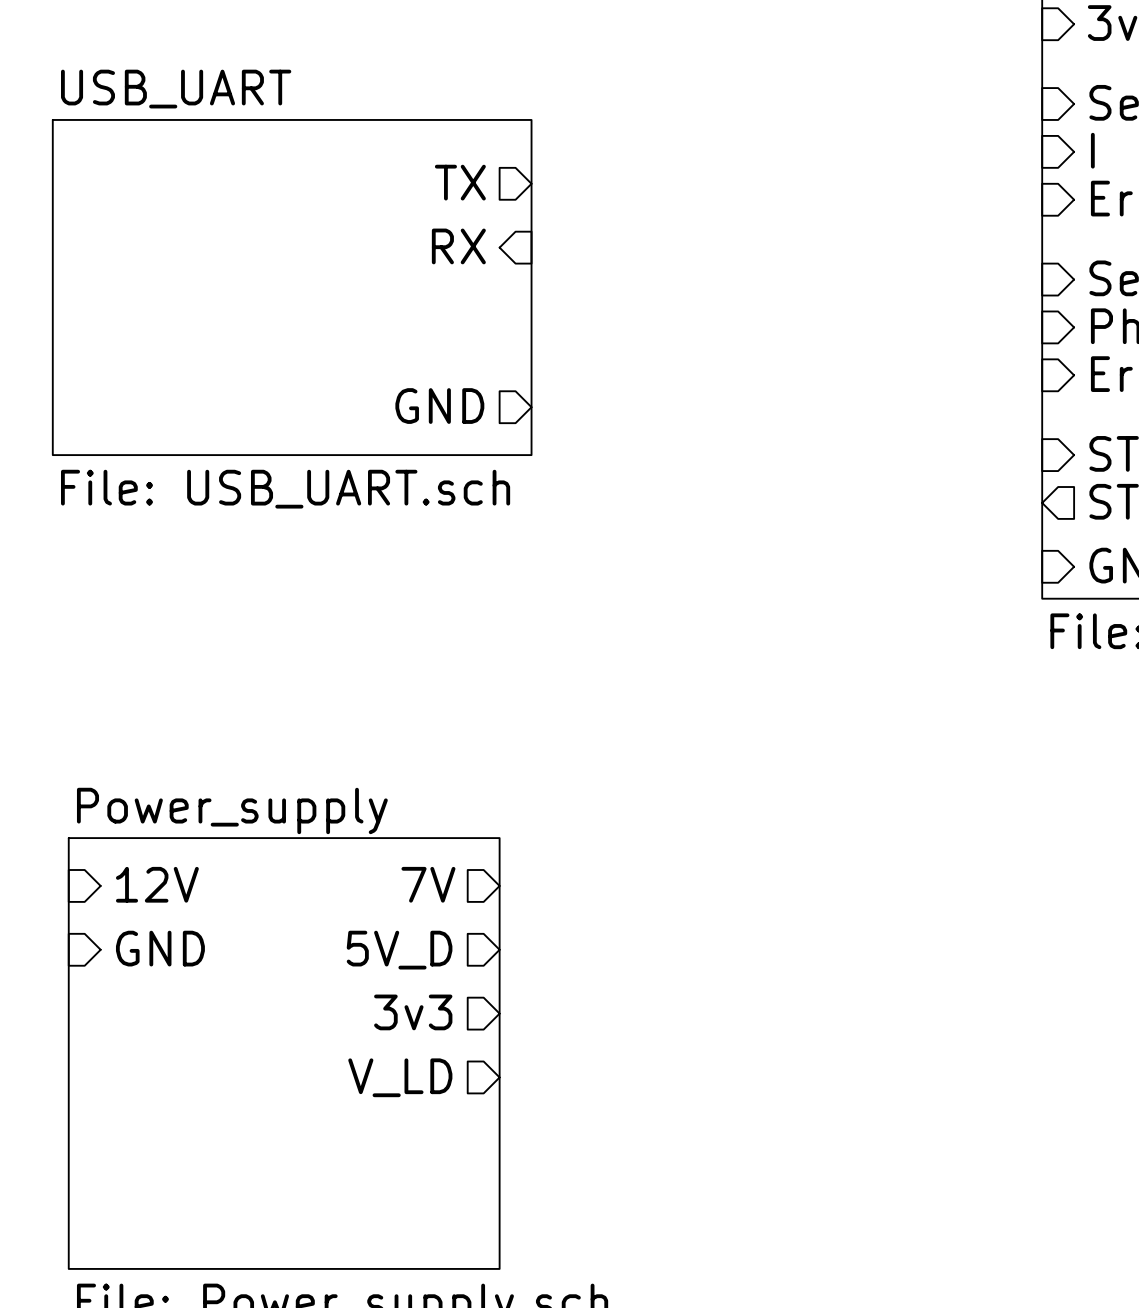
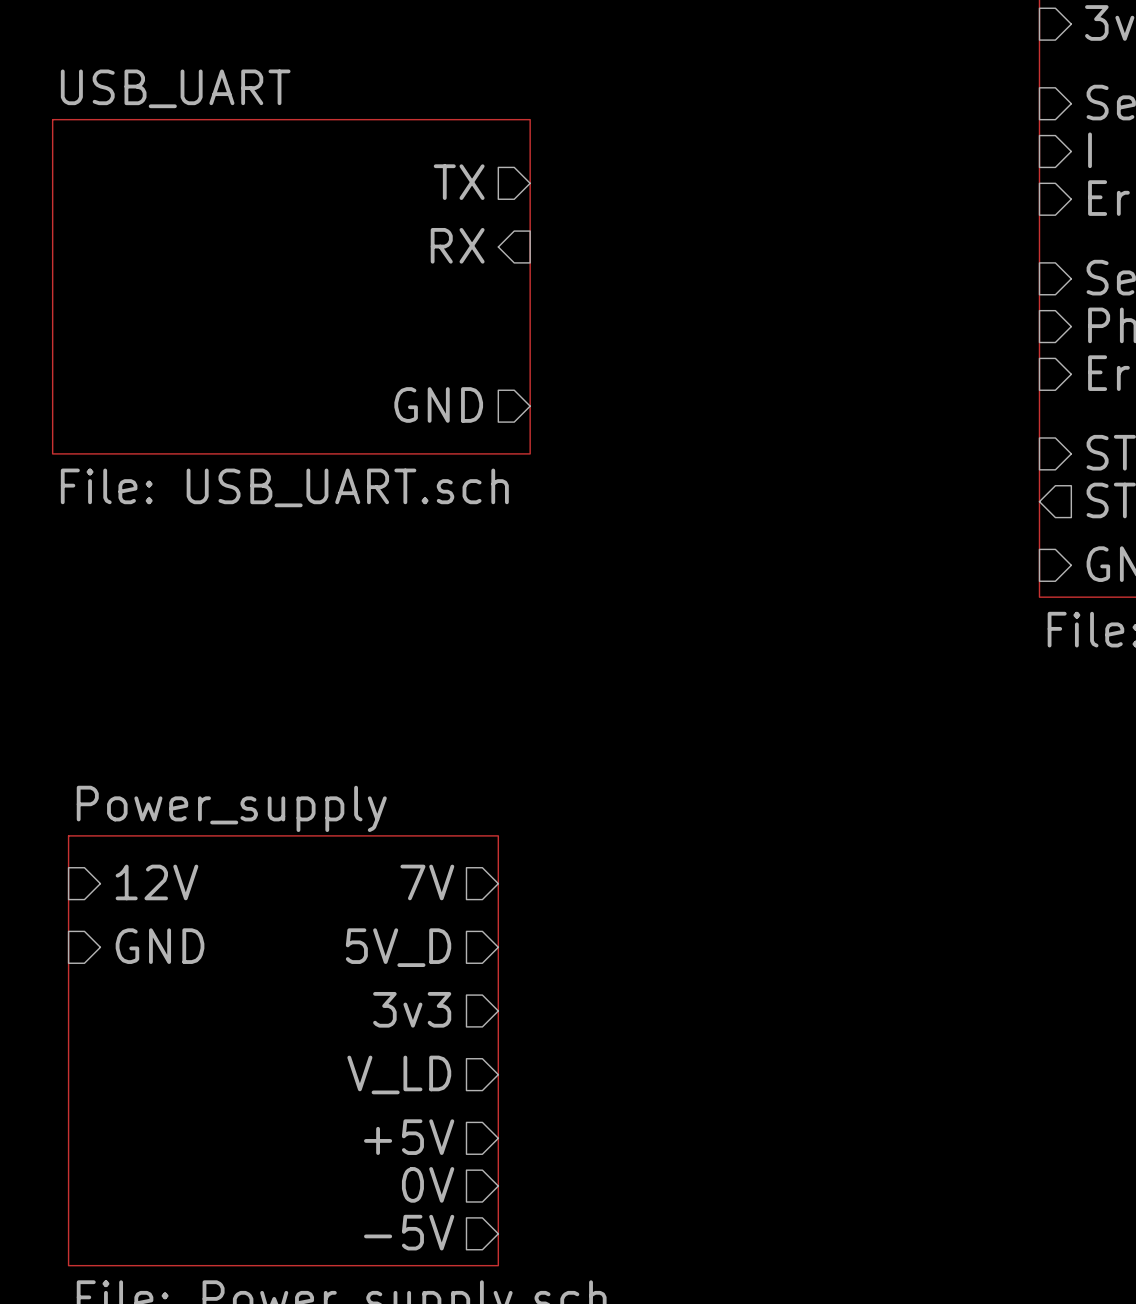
sheet pin: none -> +5V (409, 1137)
sheet pin: none -> 0V (428, 1184)
sheet pin: none -> -5V (409, 1232)

